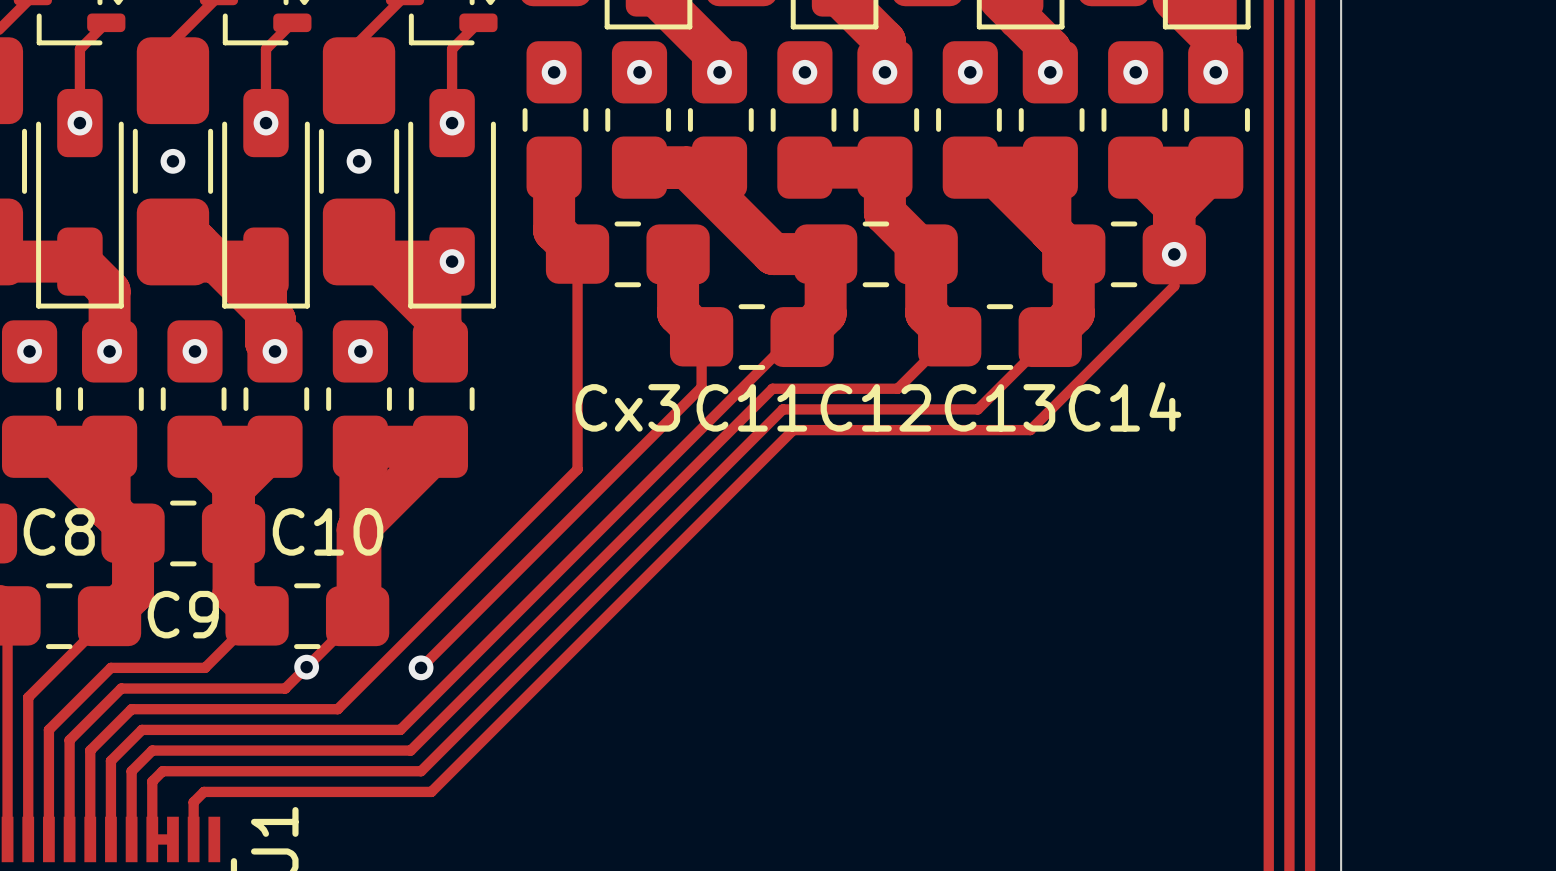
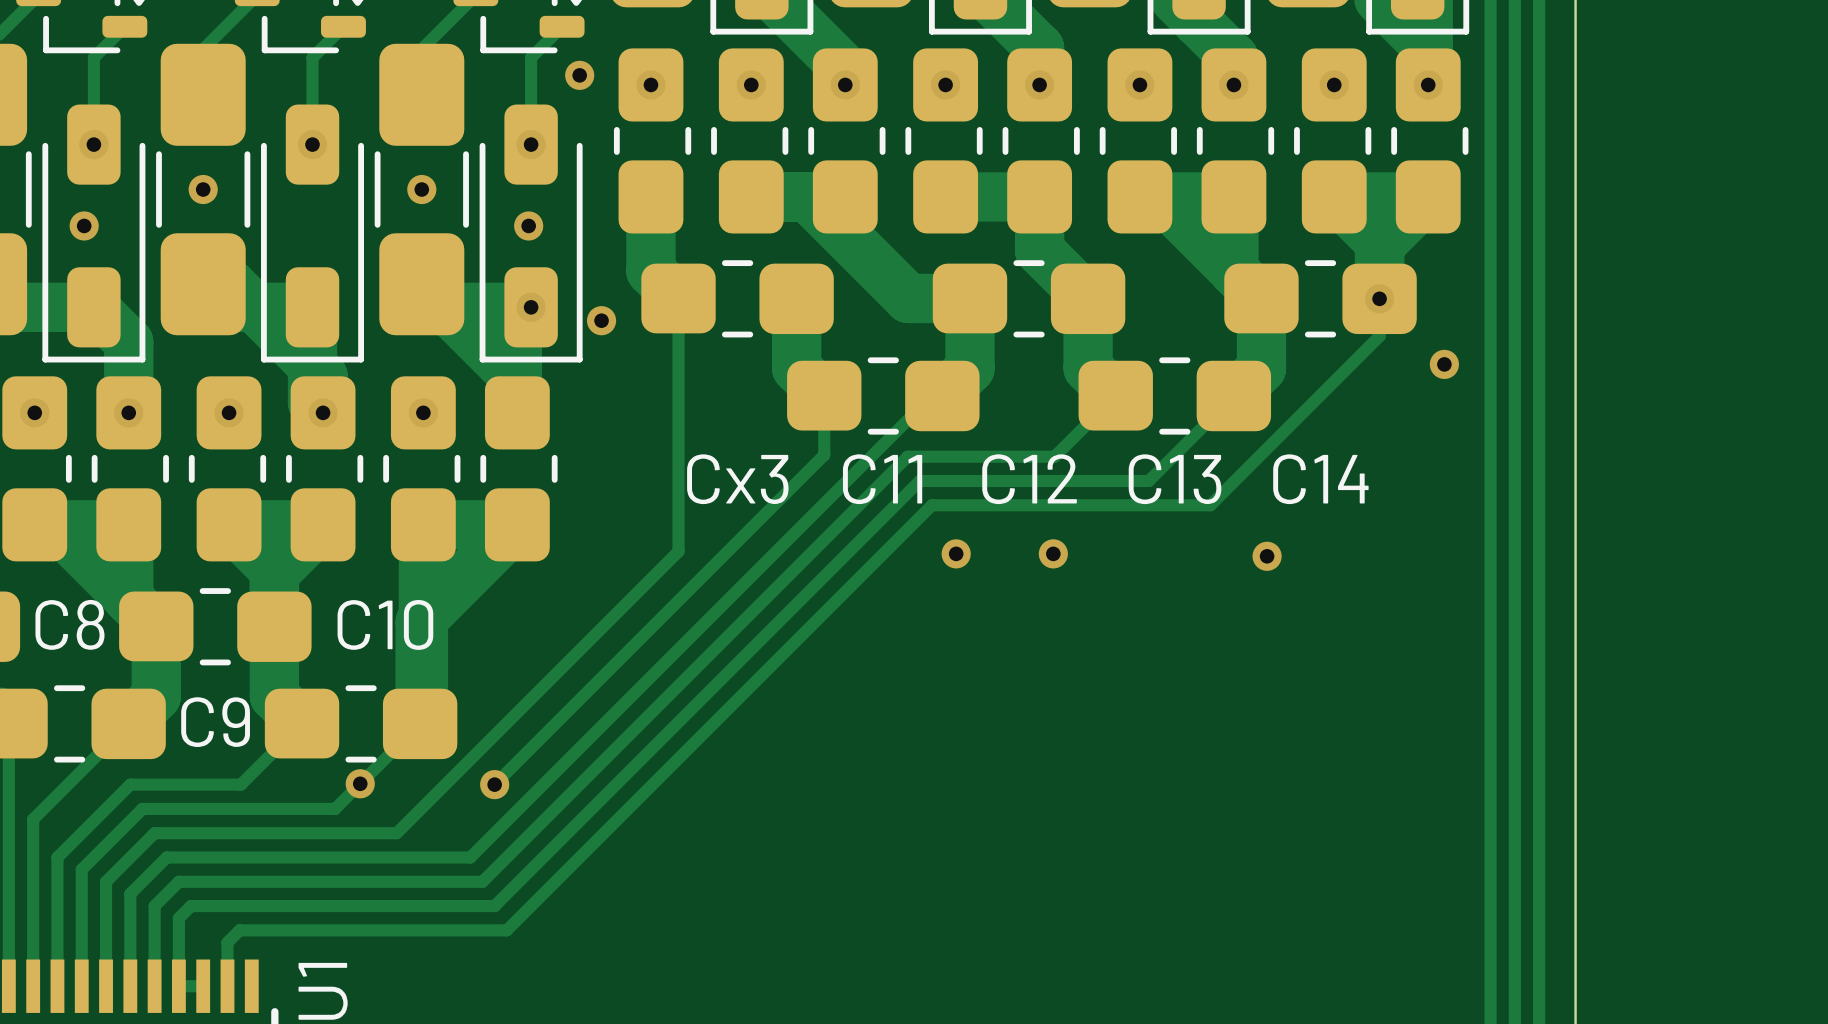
via: none -> (579, 75)
via: none -> (84, 225)
via: none -> (528, 225)
via: none -> (601, 320)
via: none -> (1444, 364)
via: none -> (956, 553)
via: none -> (1053, 553)
via: none -> (1267, 556)

